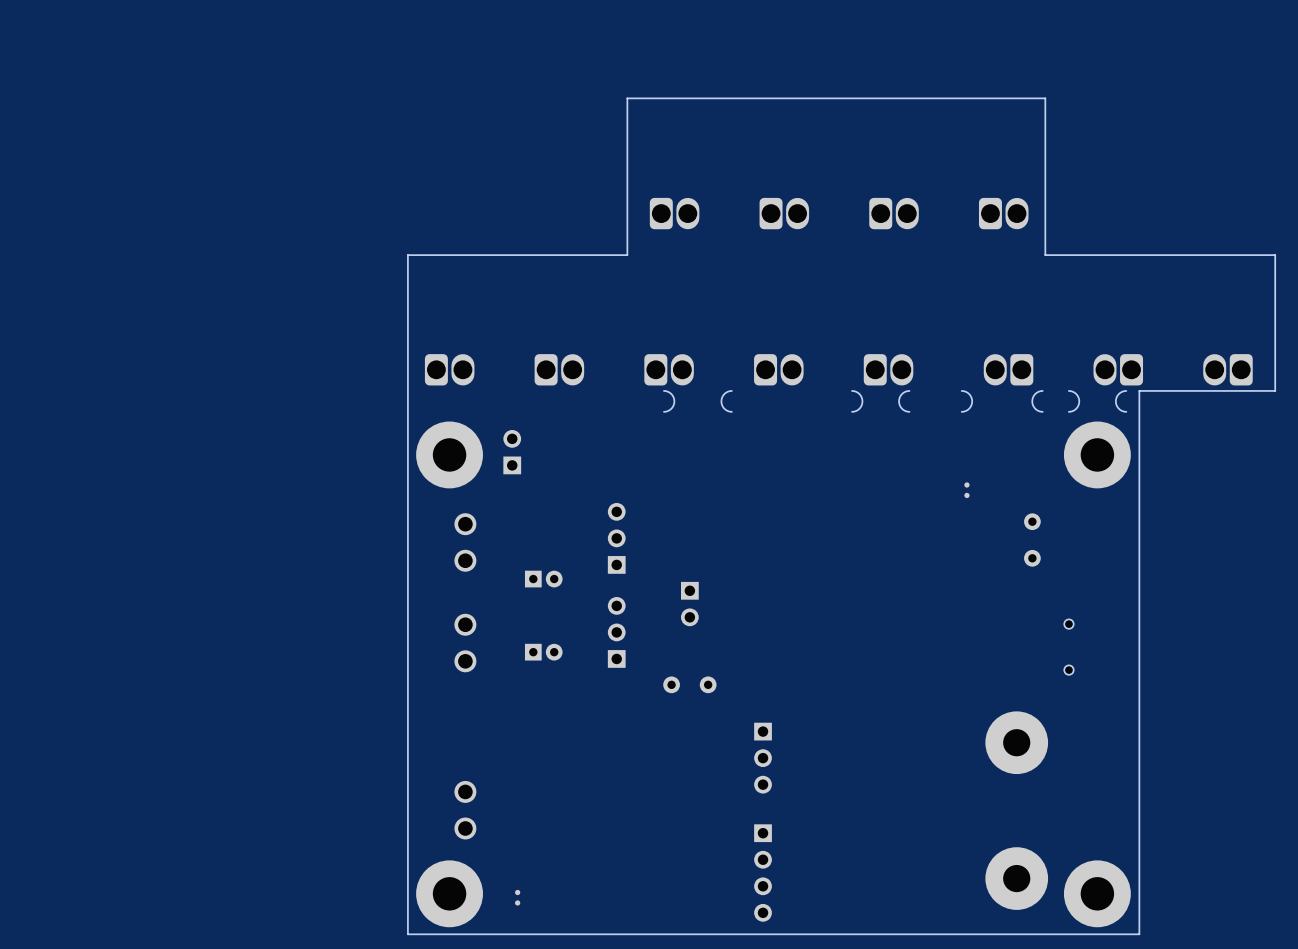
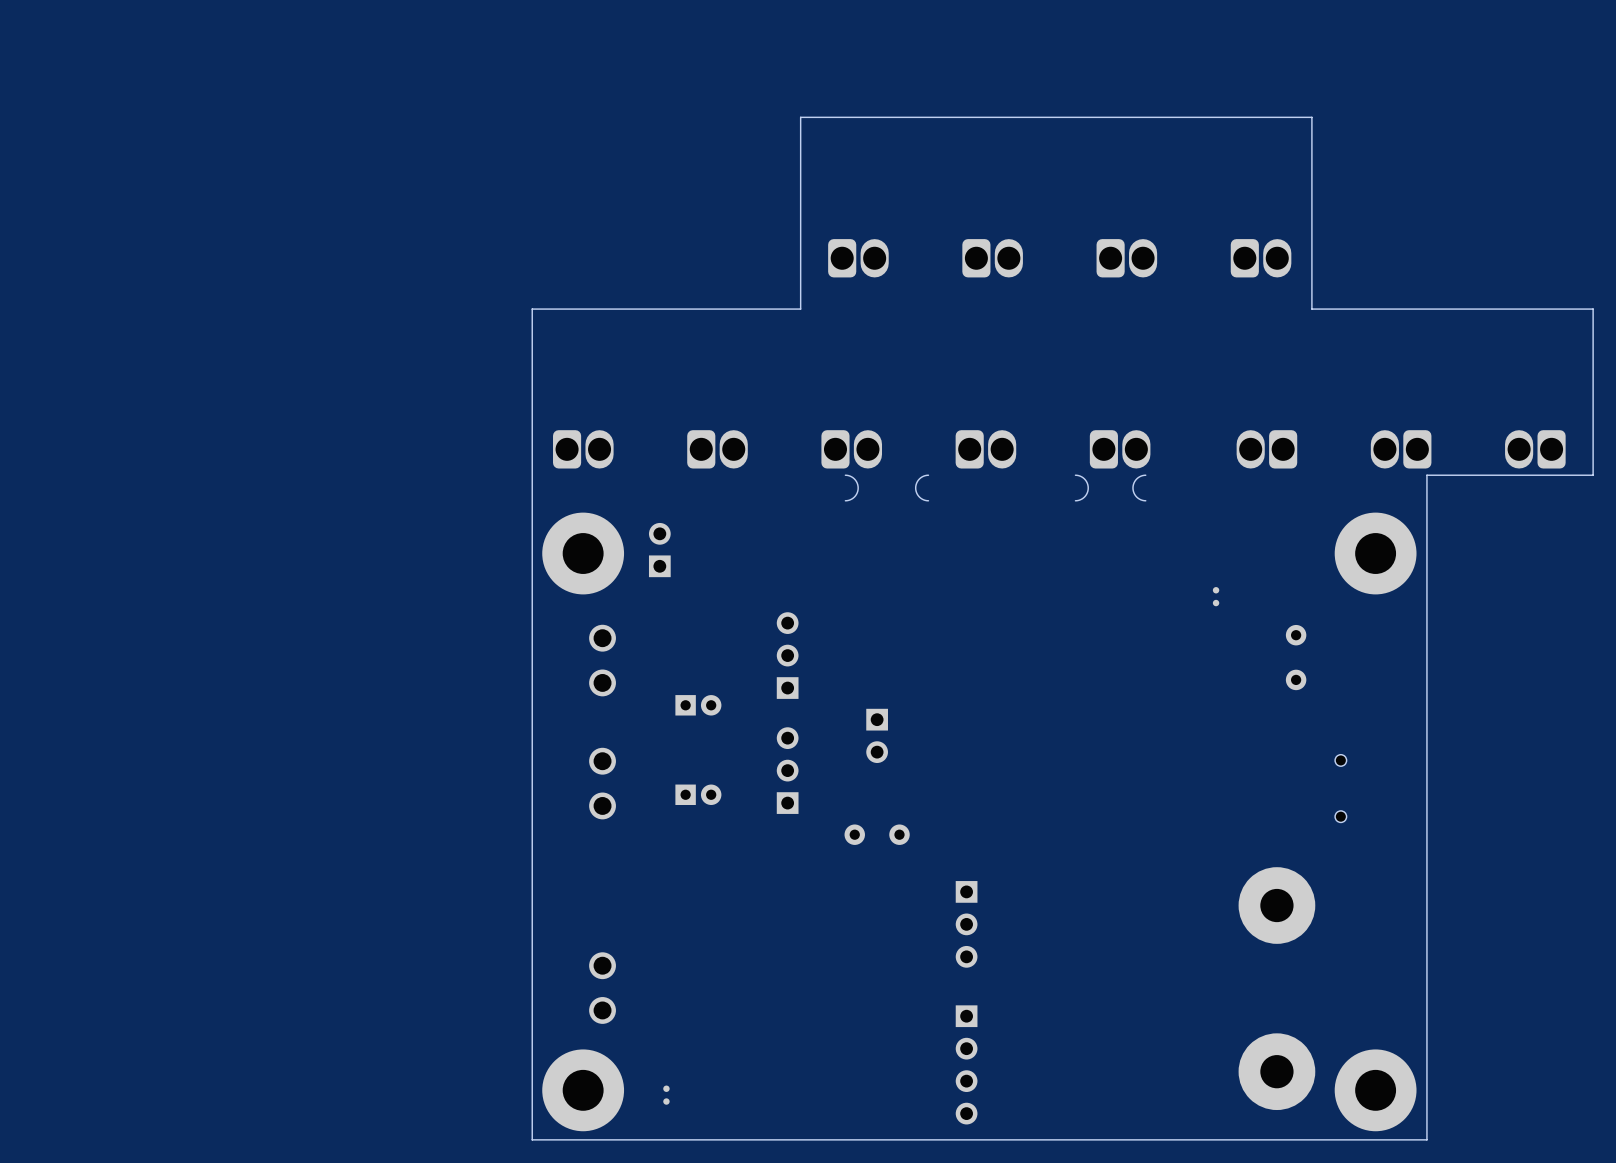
board edge: (961, 390) (969, 394) (972, 401) (969, 408) (961, 411) -> none
board edge: (1042, 390) (1035, 394) (1032, 401) (1035, 408) (1042, 411) -> none
board edge: (1068, 390) (1076, 394) (1079, 401) (1076, 408) (1068, 411) -> none
board edge: (1126, 390) (1118, 394) (1115, 401) (1118, 408) (1126, 411) -> none

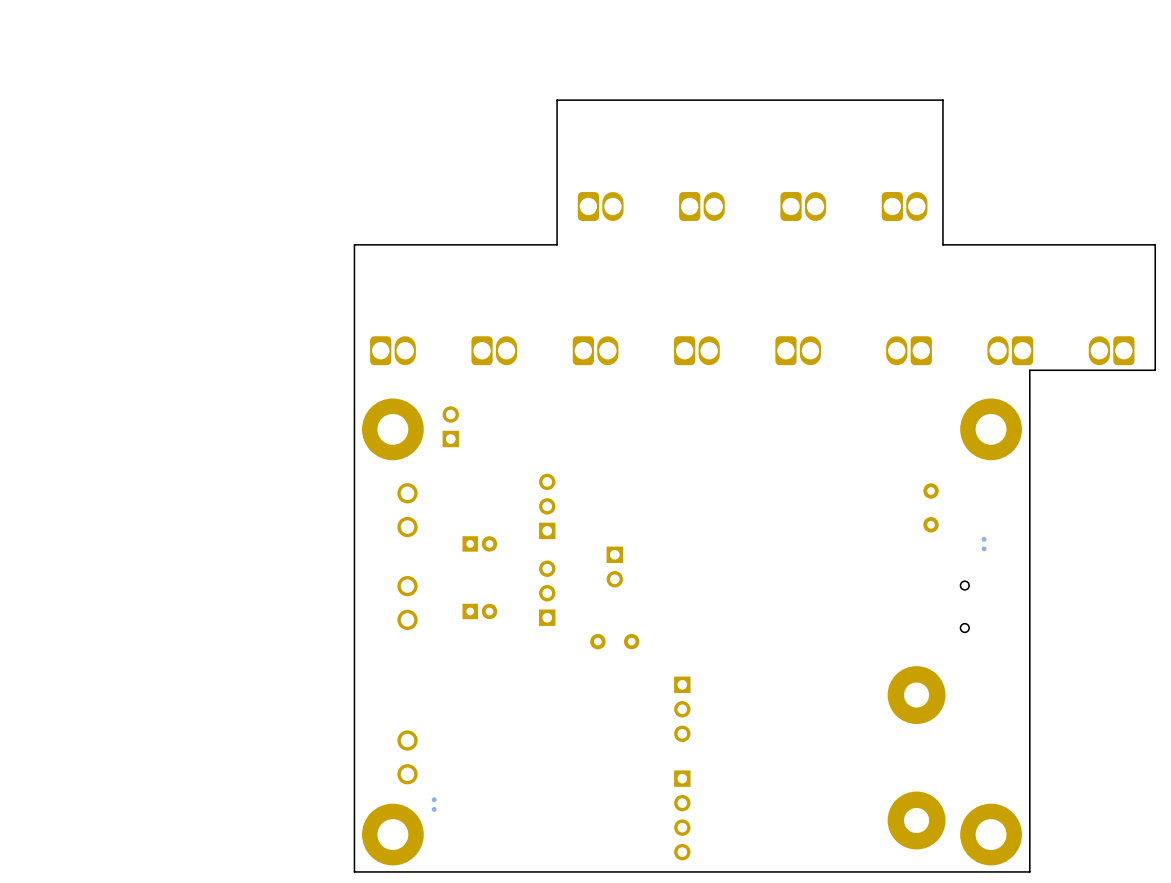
board edge: (845, 475) (854, 478) (858, 488) (854, 497) (845, 500) -> none
board edge: (928, 475) (919, 478) (915, 488) (919, 497) (928, 500) -> none
board edge: (1075, 475) (1084, 478) (1088, 488) (1084, 497) (1075, 500) -> none
board edge: (1145, 475) (1136, 478) (1132, 488) (1136, 497) (1145, 500) -> none
part position: (1216, 596) -> (984, 544)
part position: (666, 1095) -> (434, 804)

